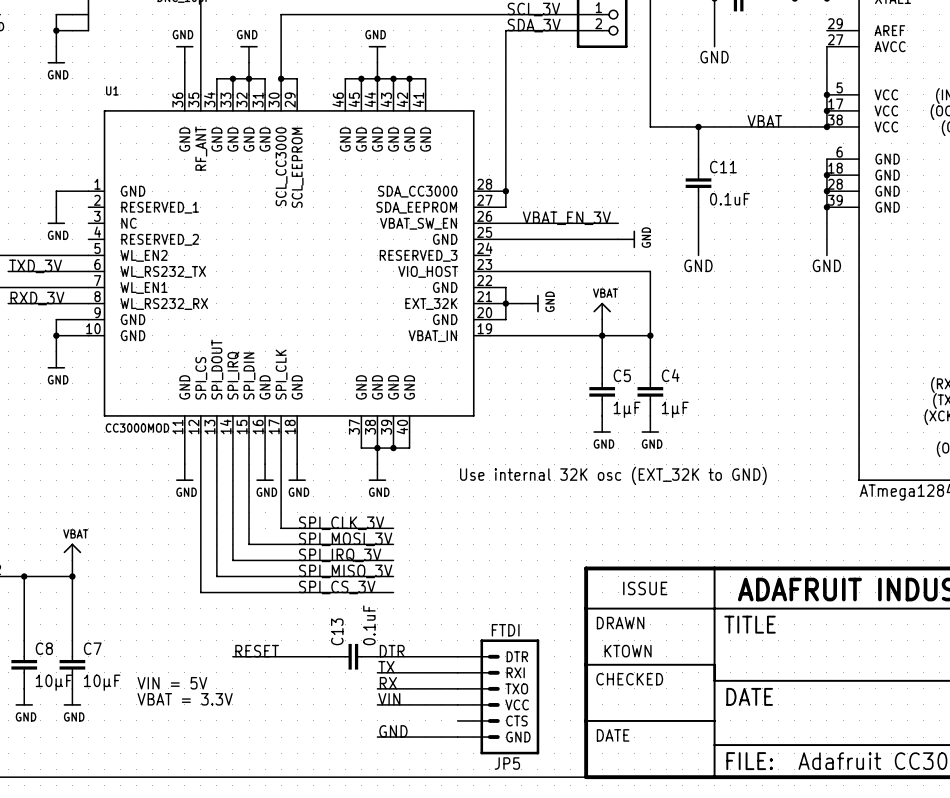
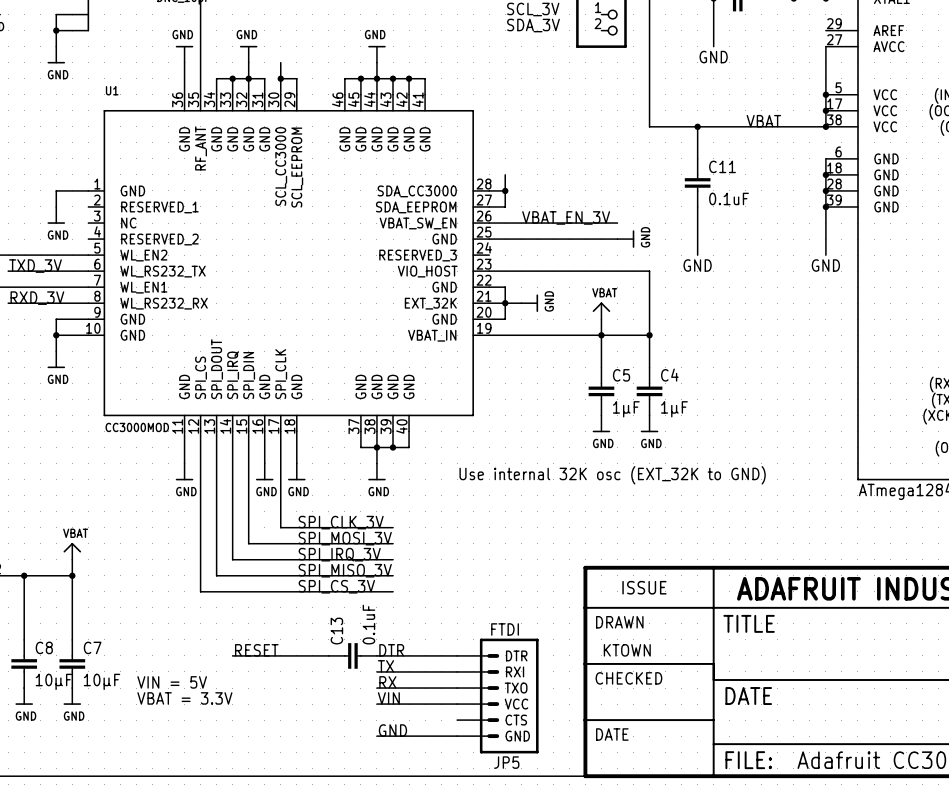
wire: (602, 14) (281, 14) (281, 62) -> none
wire: (602, 30) (505, 30) (505, 175) -> none

